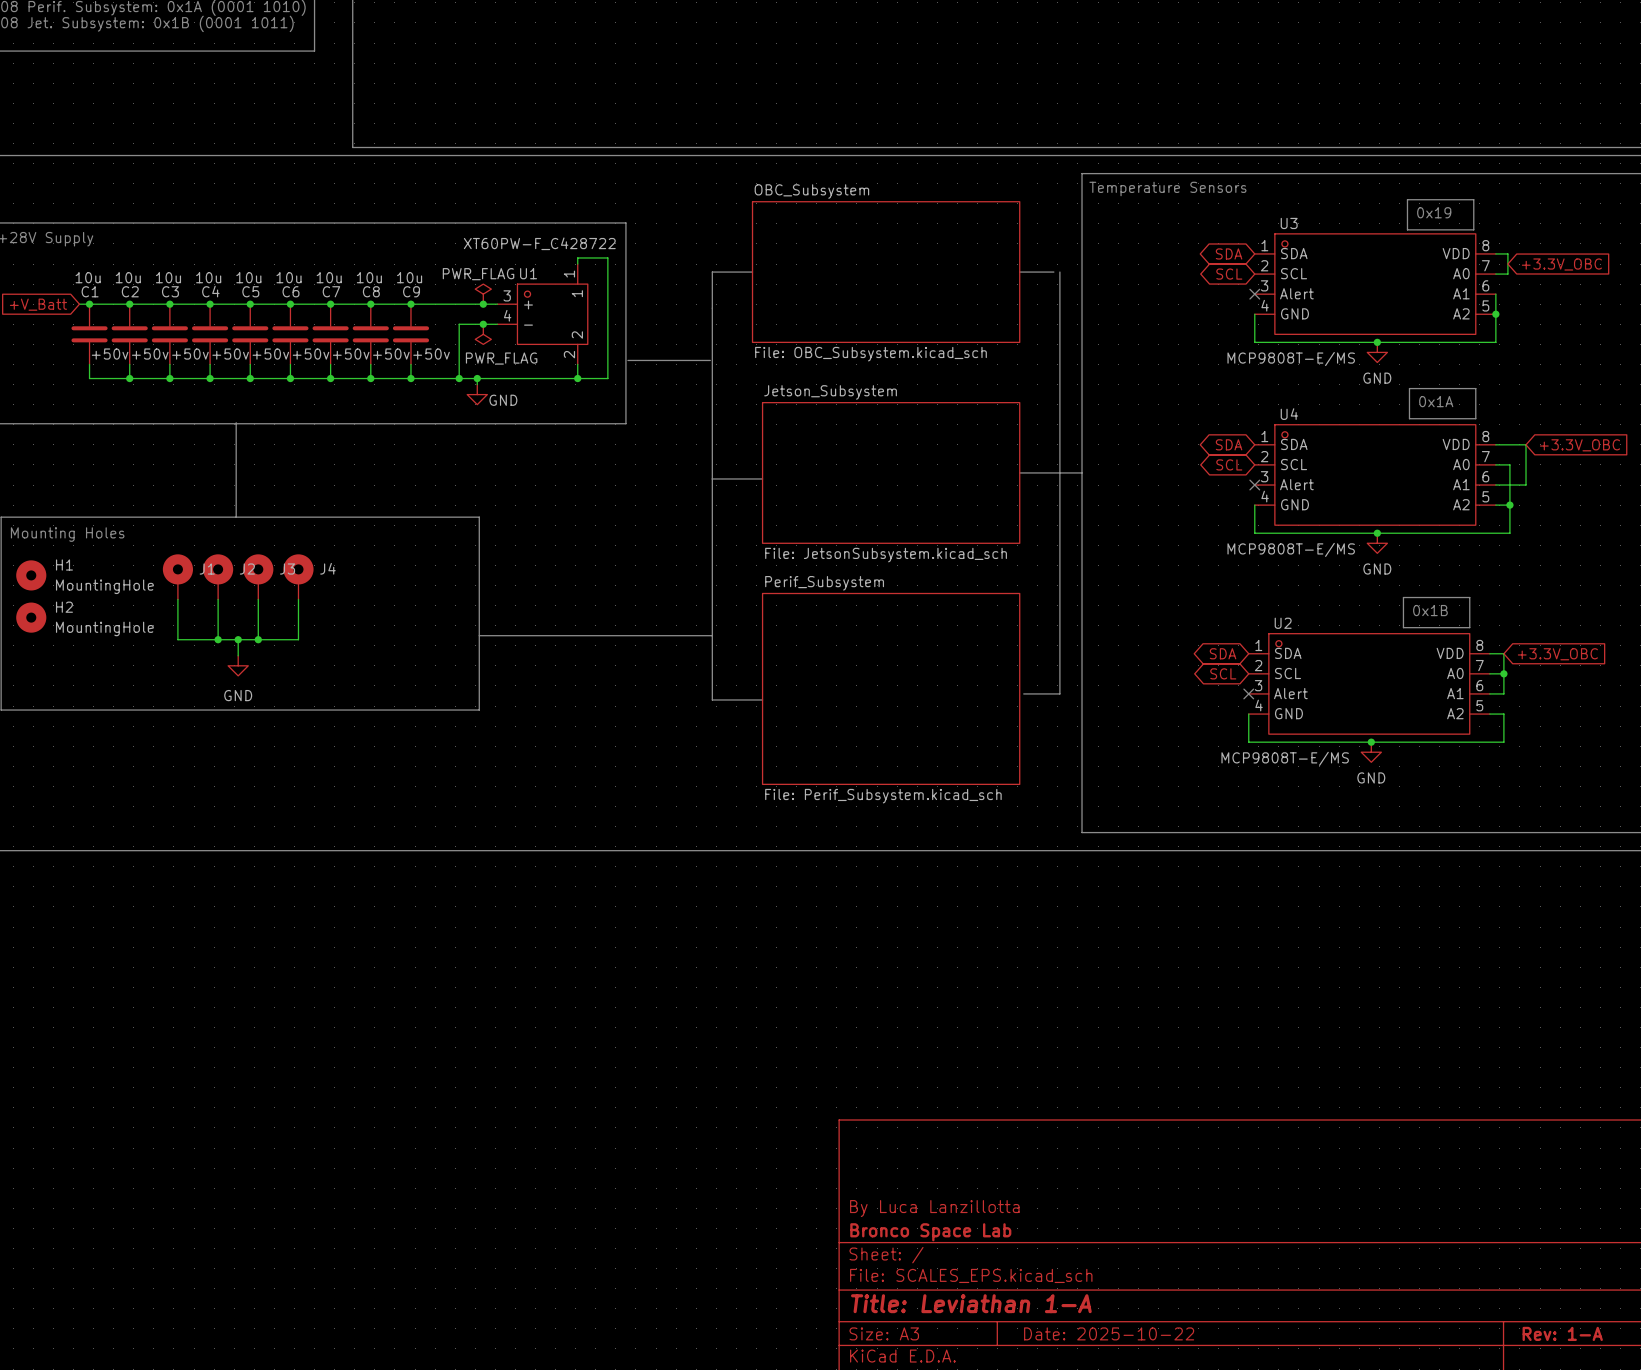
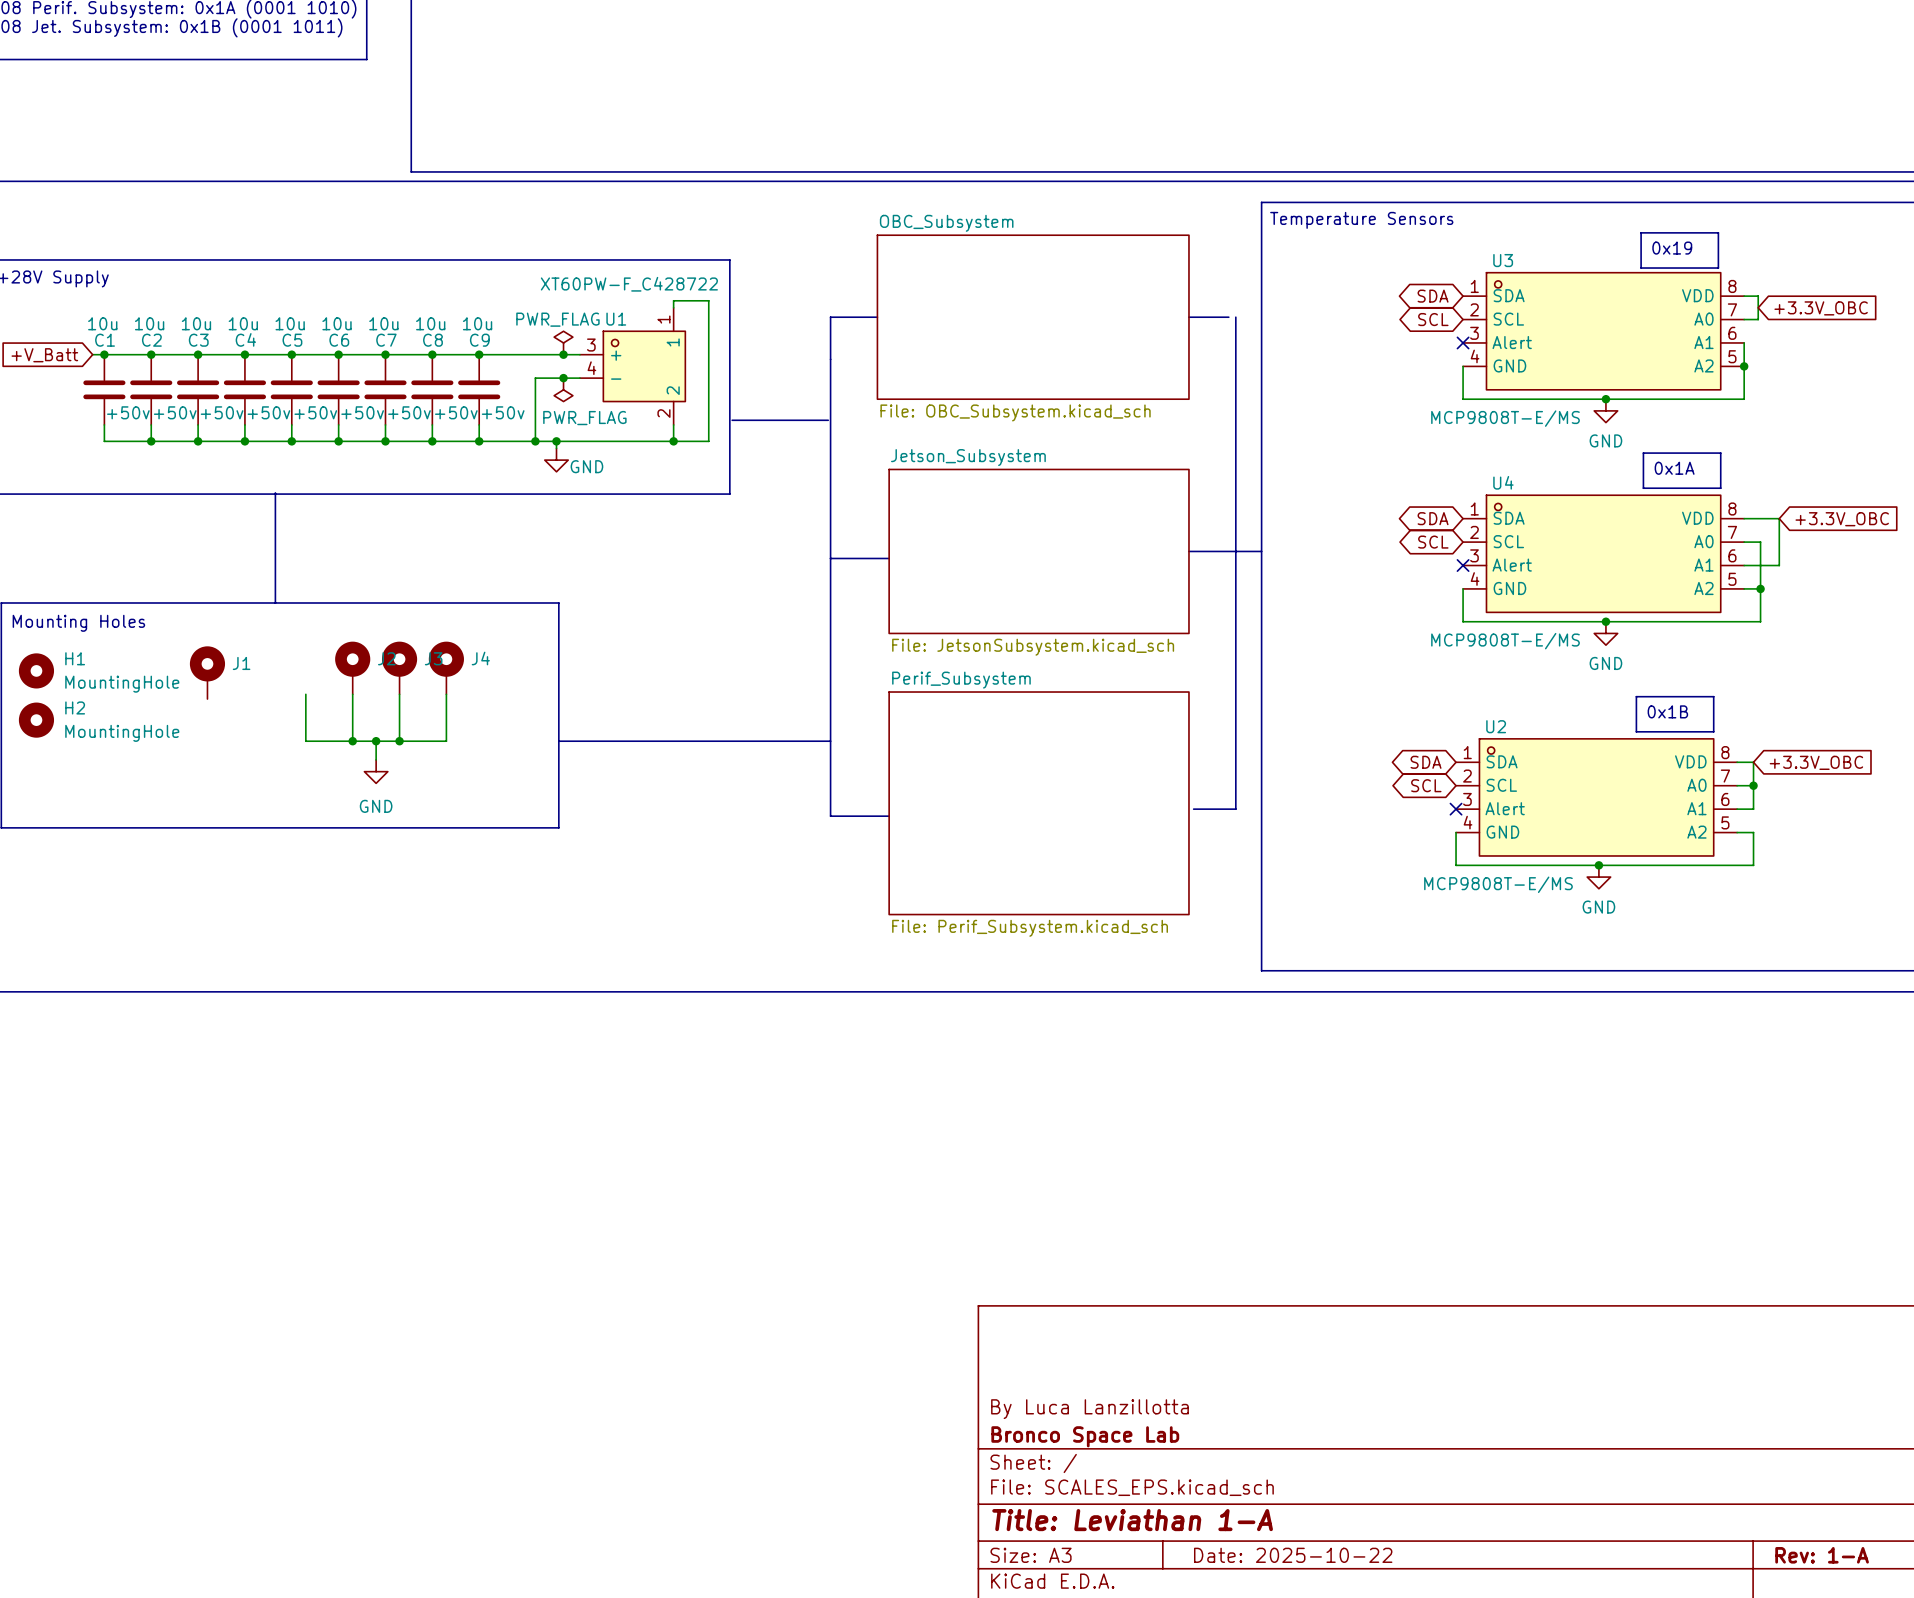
J2 position: (218, 576) -> (352, 668)
J3 position: (258, 576) -> (399, 668)
J4 position: (298, 576) -> (446, 668)
wire: (177, 599) (177, 639) (298, 639) (298, 599) -> (305, 694) (305, 741) (446, 741) (446, 694)
wire: (218, 599) (218, 639) -> (352, 694) (352, 741)
wire: (258, 599) (258, 639) -> (399, 694) (399, 741)
junction: none -> (352, 741)
junction: none -> (376, 741)
junction: none -> (399, 741)
junction: (218, 639) -> none
wire: (238, 639) (238, 655) -> (376, 741) (376, 759)
junction: (238, 639) -> none
junction: (258, 639) -> none
power symbol position: GND (238, 665) -> GND (376, 771)

